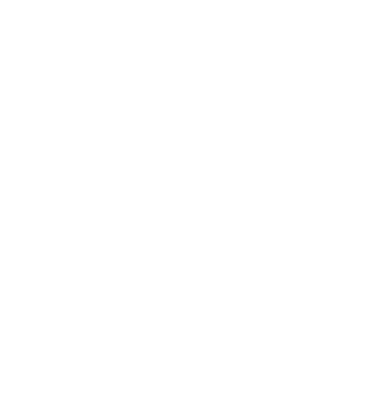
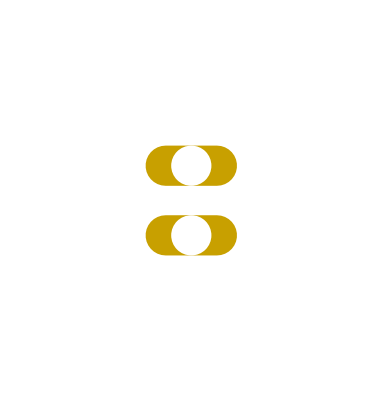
part: none -> (191, 200)

